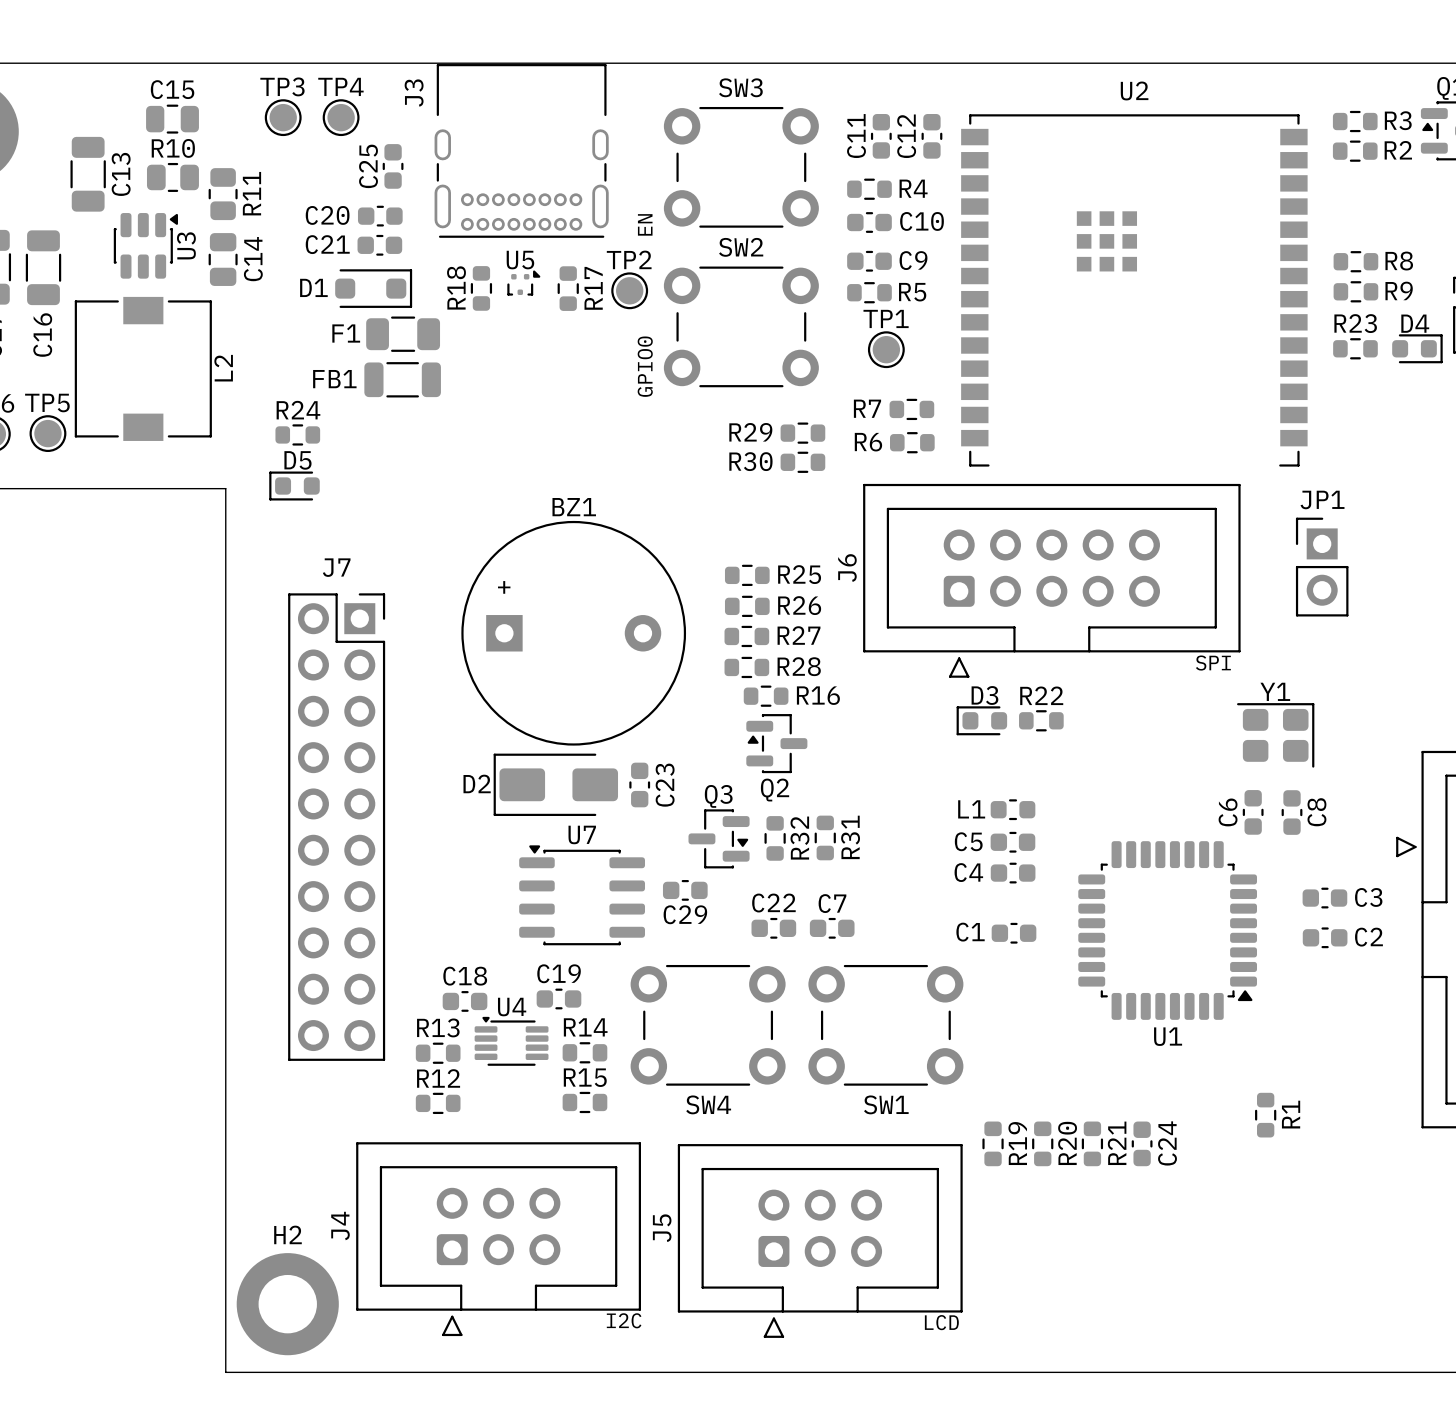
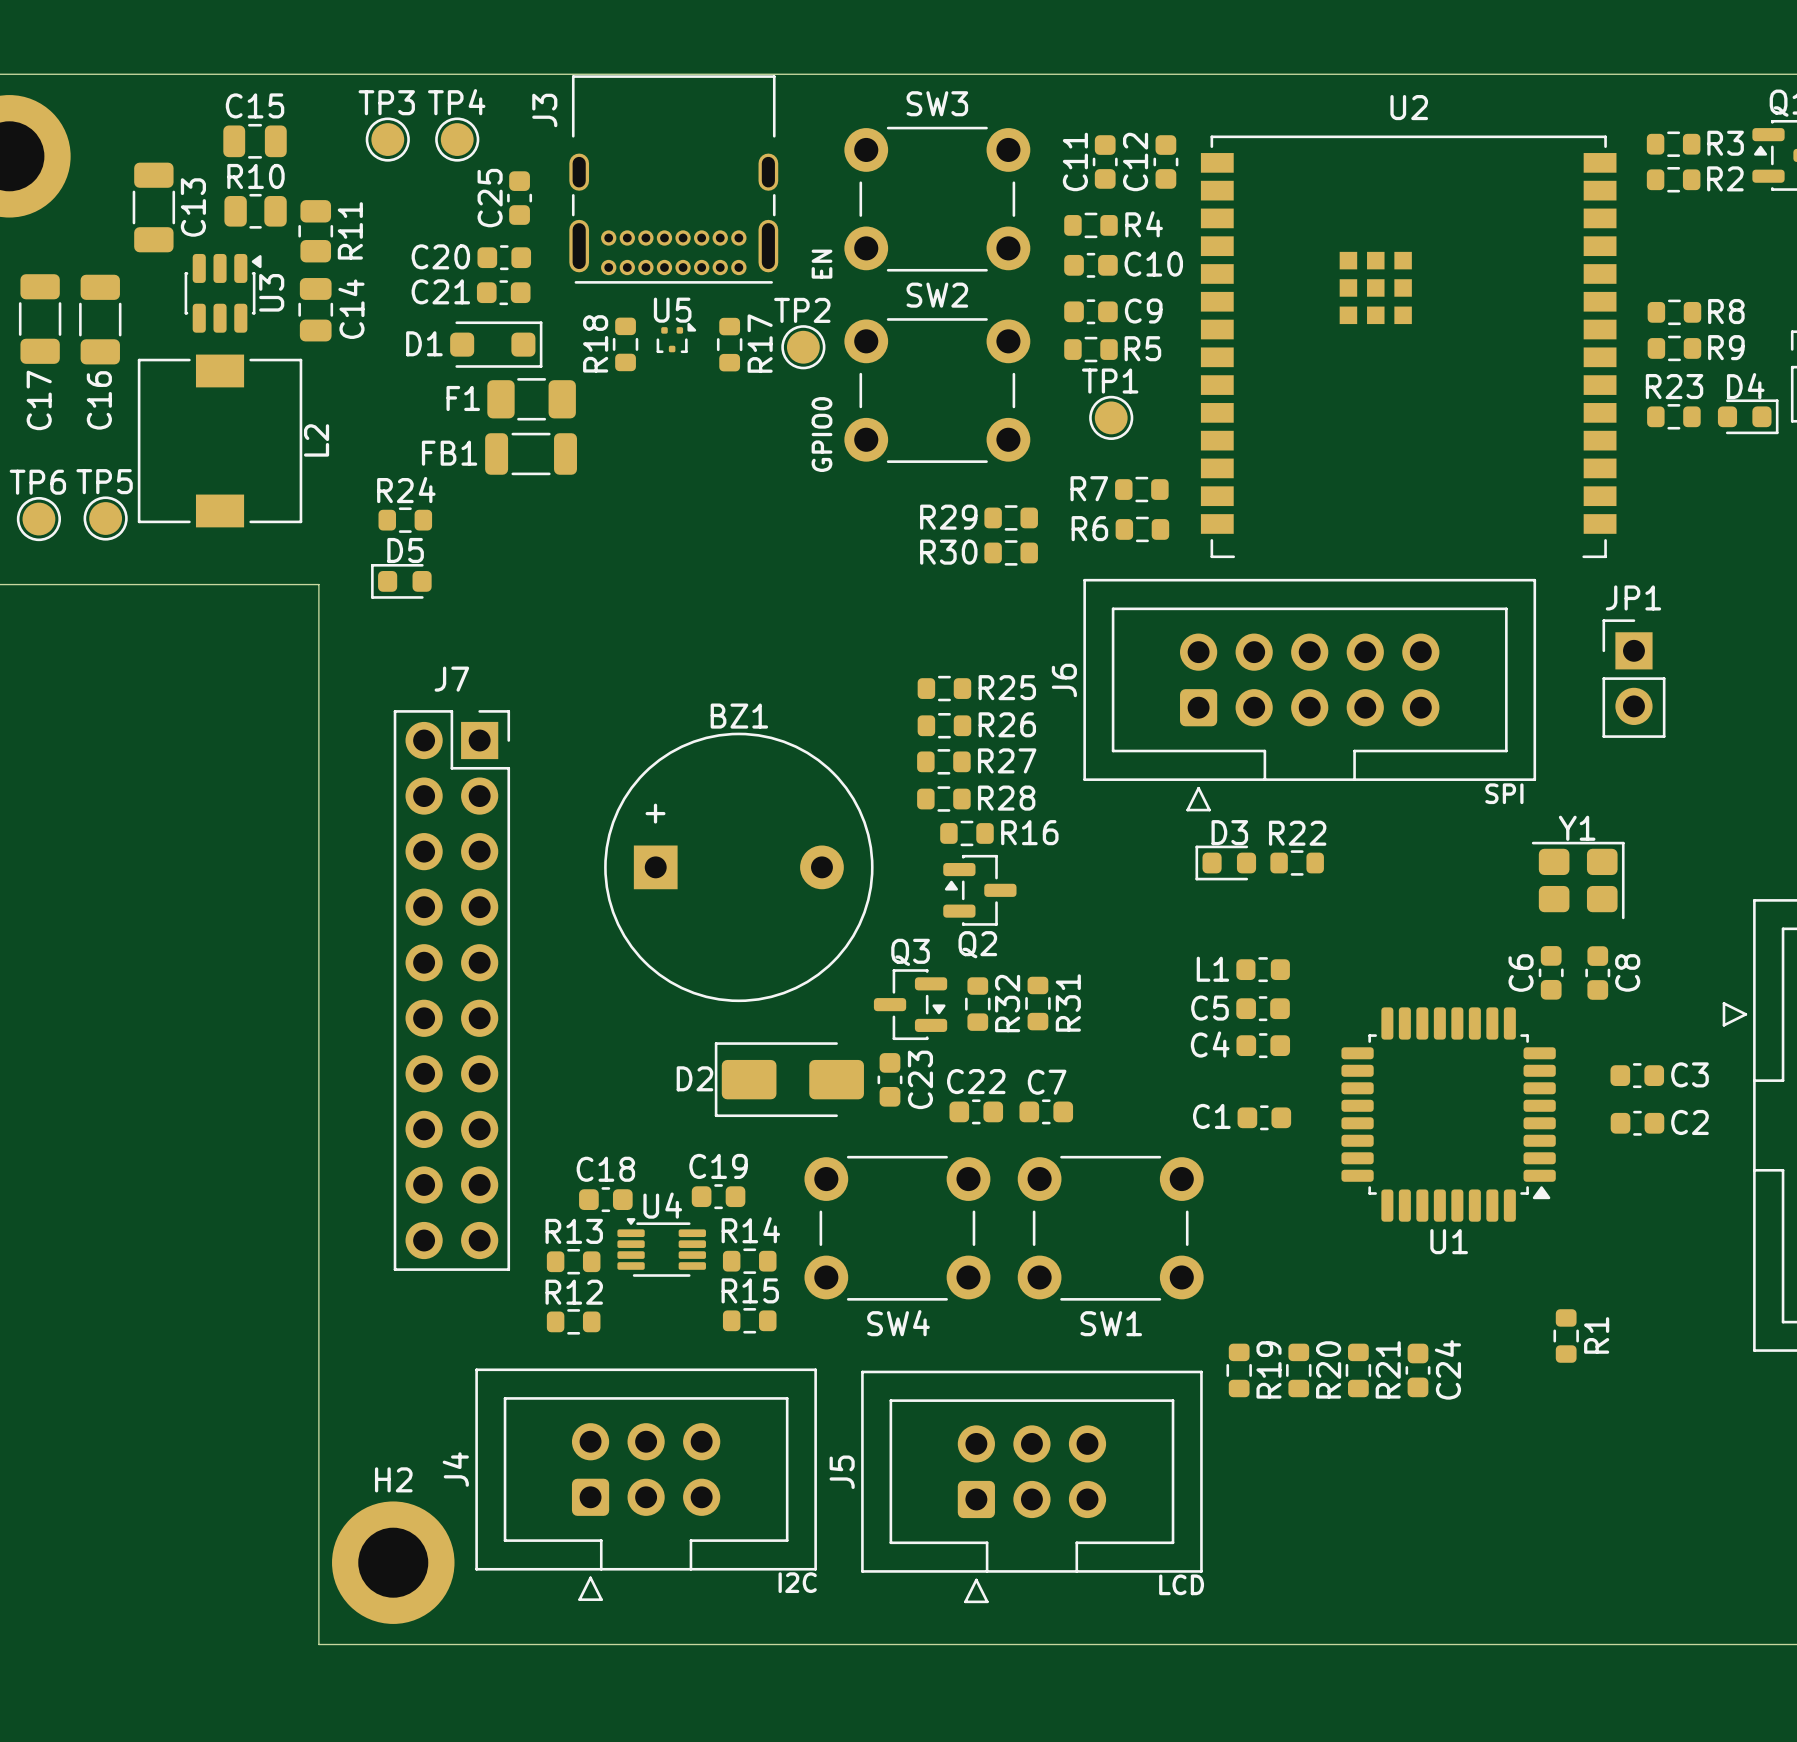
BZ1 position: (573, 633) -> (738, 867)
D2 position: (555, 784) -> (789, 1079)
C23 position: (639, 784) -> (889, 1079)
C29: (685, 890) -> none
U7: (582, 895) -> none

